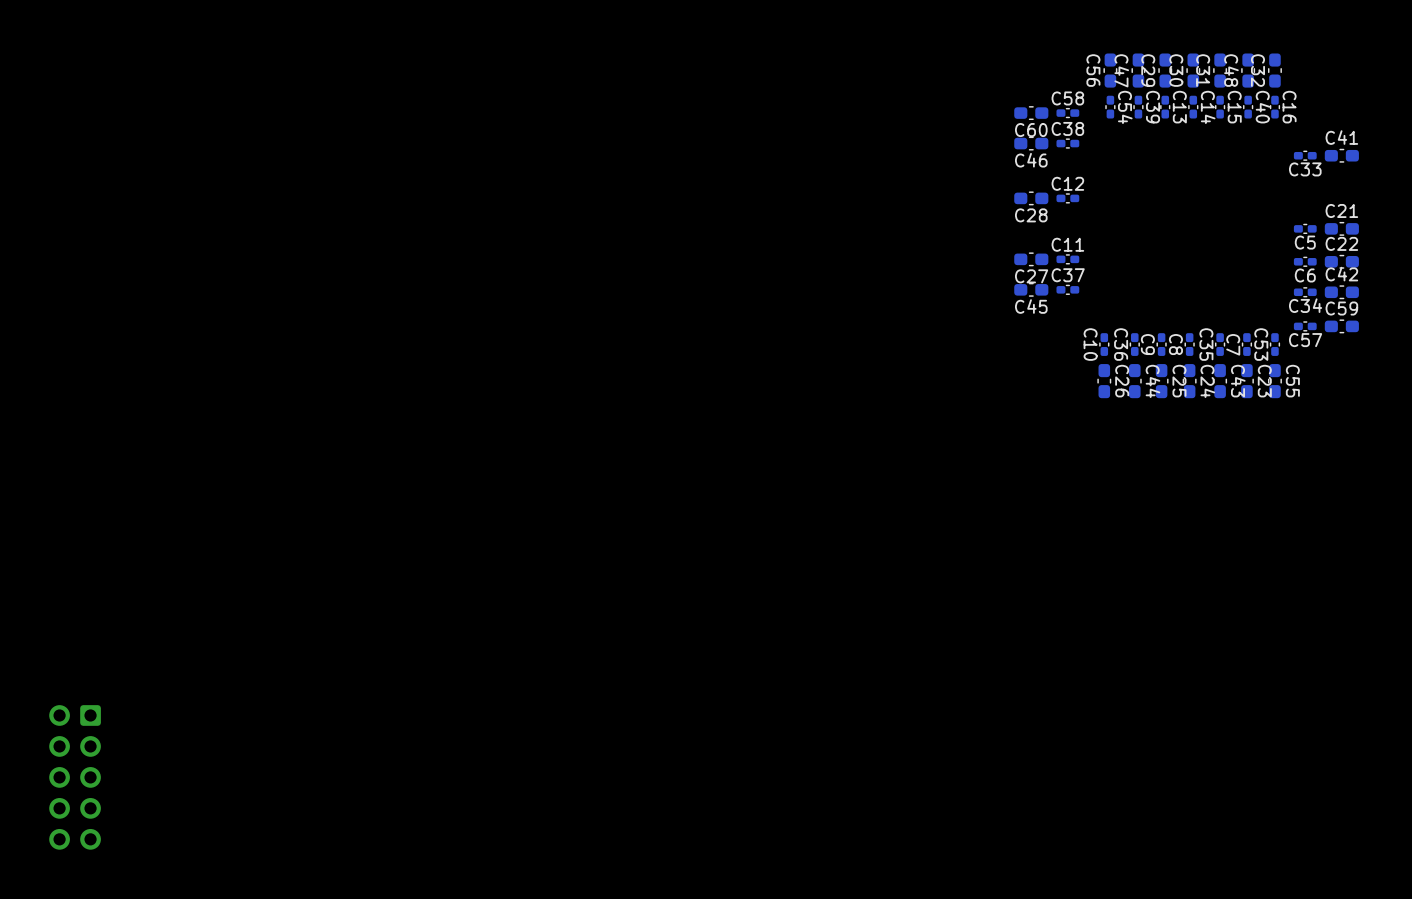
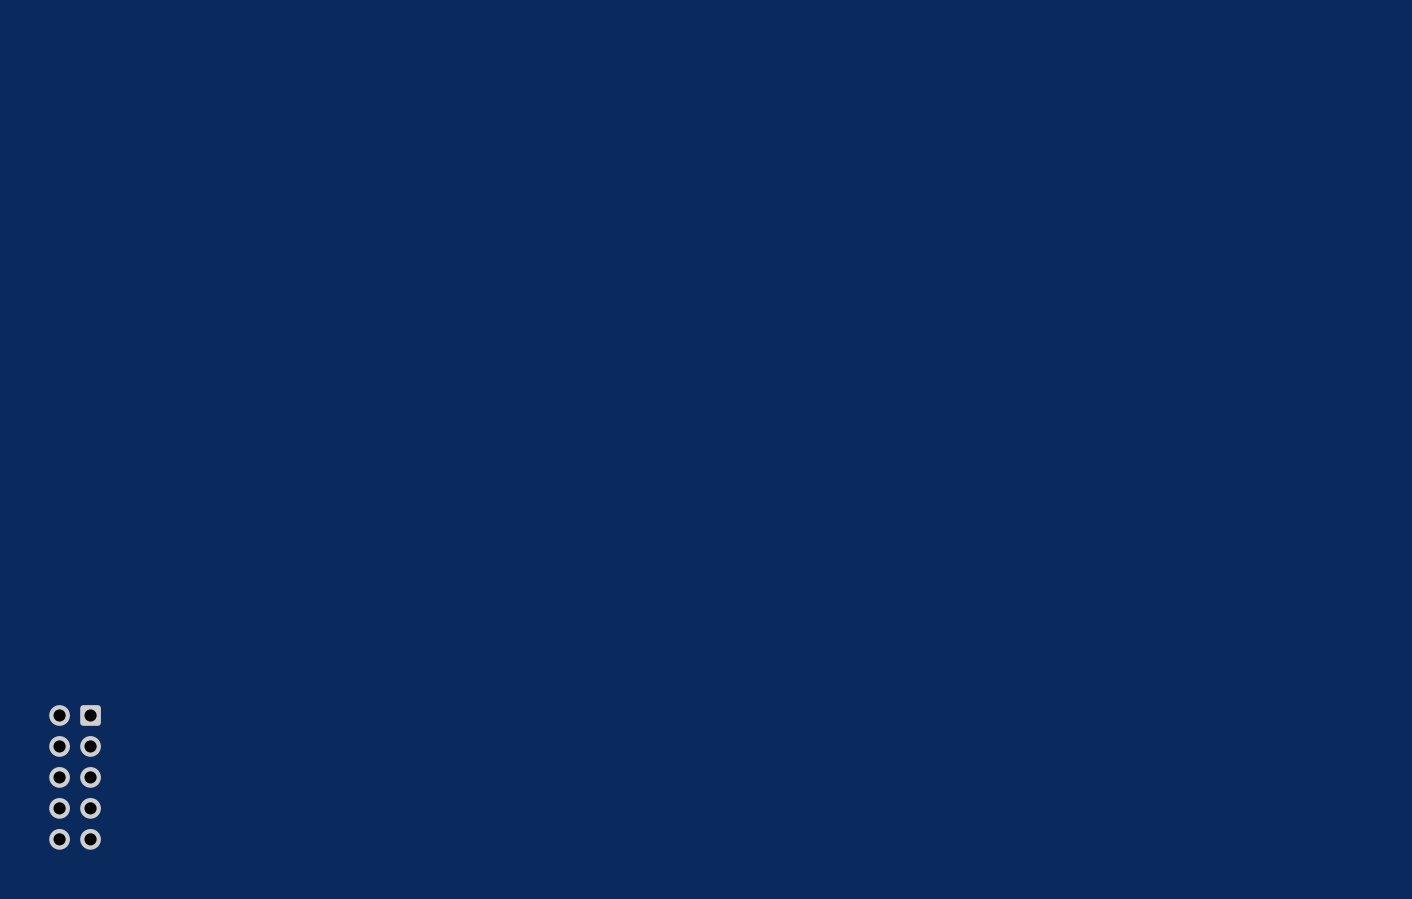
C56: (1110, 70) -> none
C47: (1138, 70) -> none
C29: (1165, 70) -> none
C30: (1193, 70) -> none
C31: (1220, 70) -> none
C48: (1248, 70) -> none
C32: (1274, 70) -> none
C54: (1110, 107) -> none
C39: (1138, 107) -> none
C13: (1165, 107) -> none
C14: (1193, 107) -> none
C15: (1220, 107) -> none
C40: (1248, 107) -> none
C16: (1274, 107) -> none
C60: (1031, 113) -> none
C58: (1067, 113) -> none
C46: (1031, 143) -> none
C38: (1067, 143) -> none
C33: (1305, 155) -> none
C41: (1341, 155) -> none
C28: (1031, 198) -> none
C12: (1067, 198) -> none
C5: (1305, 228) -> none
C21: (1341, 228) -> none
C27: (1031, 259) -> none
C11: (1067, 259) -> none
C6: (1305, 261) -> none
C22: (1341, 261) -> none
C45: (1031, 289) -> none
C37: (1067, 289) -> none
C34: (1305, 292) -> none
C42: (1341, 292) -> none
C57: (1305, 326) -> none
C59: (1341, 326) -> none
C10: (1104, 344) -> none
C36: (1134, 344) -> none
C9: (1161, 344) -> none
C8: (1189, 344) -> none
C35: (1220, 344) -> none
C7: (1246, 344) -> none
C53: (1274, 344) -> none
C26: (1104, 381) -> none
C44: (1134, 381) -> none
C25: (1161, 381) -> none
C24: (1189, 381) -> none
C43: (1220, 381) -> none
C23: (1246, 381) -> none
C55: (1274, 381) -> none

